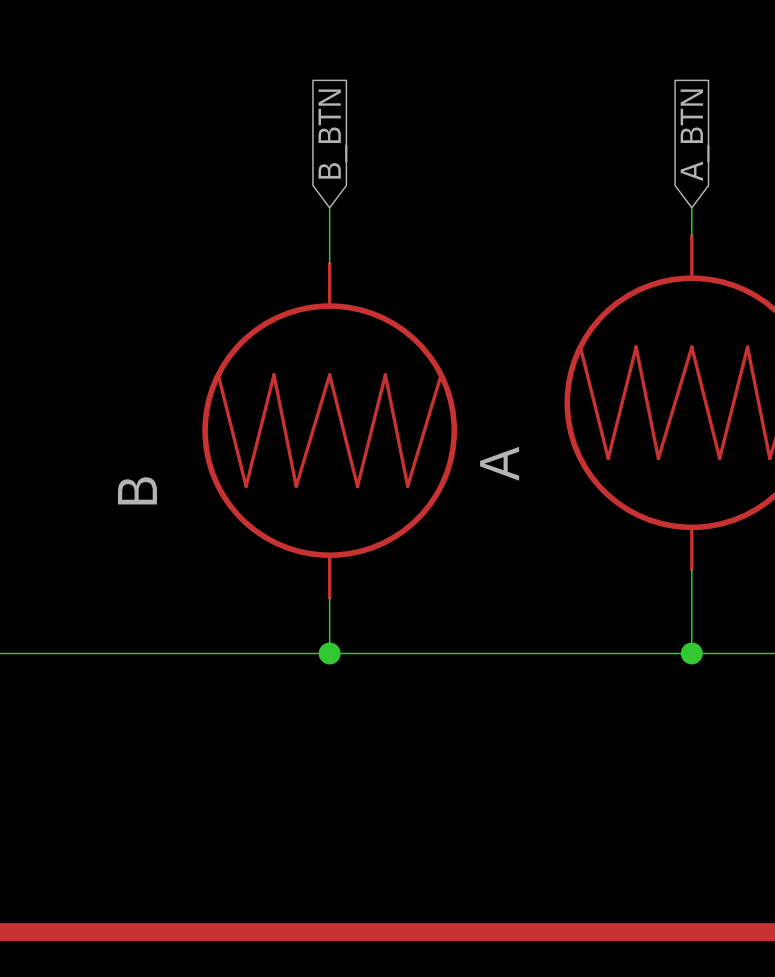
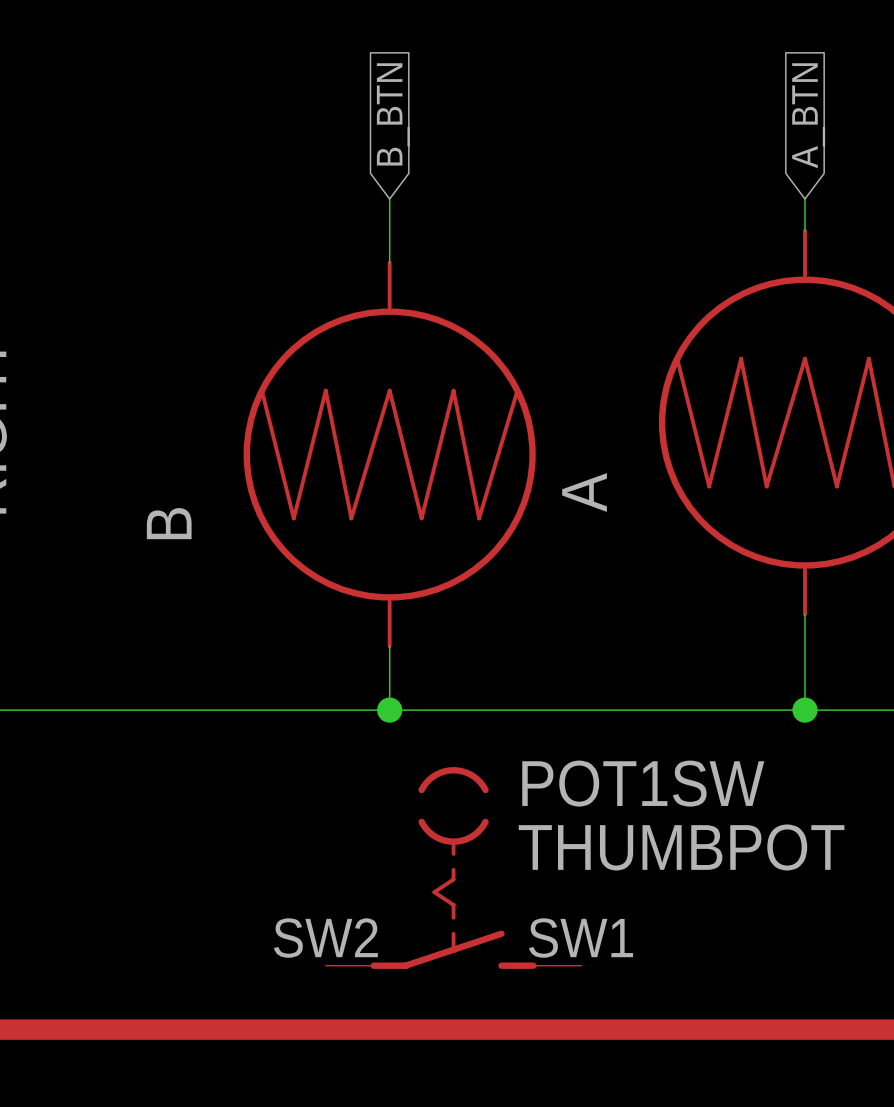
POT1SW: none -> THUMBPOT (453, 867)

